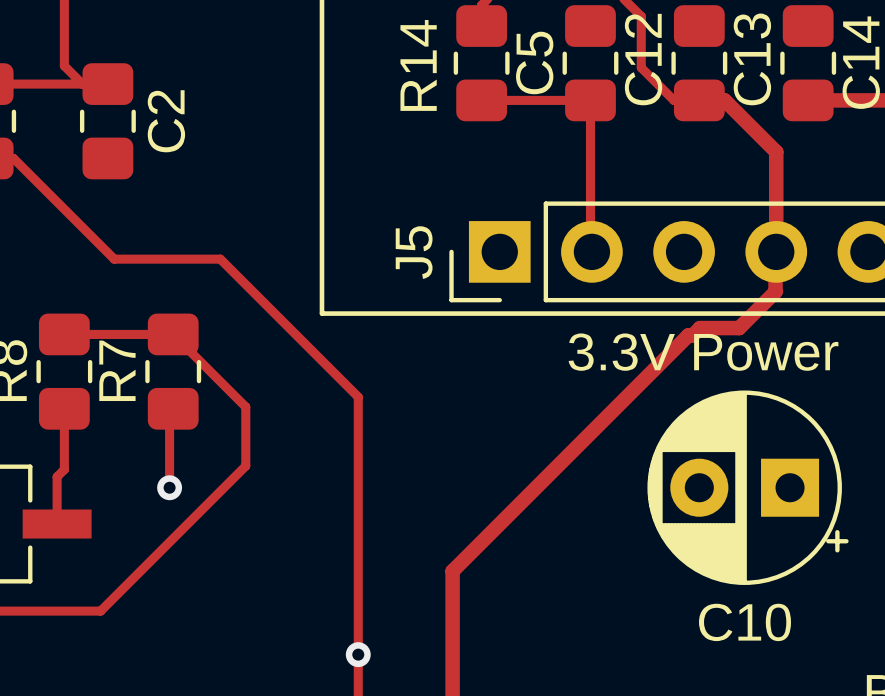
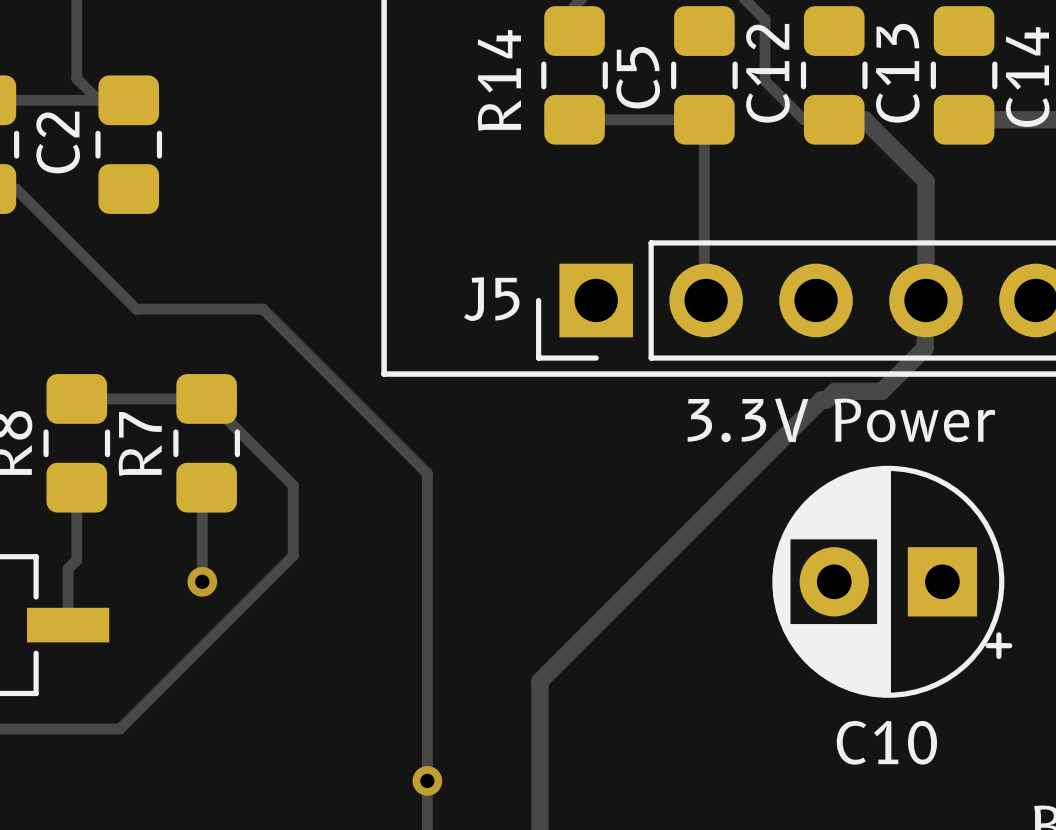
C2 name position: C2 (166, 121) -> C2 (58, 142)
J5 name rotation: 0° (414, 252) -> 90° clockwise (491, 299)

